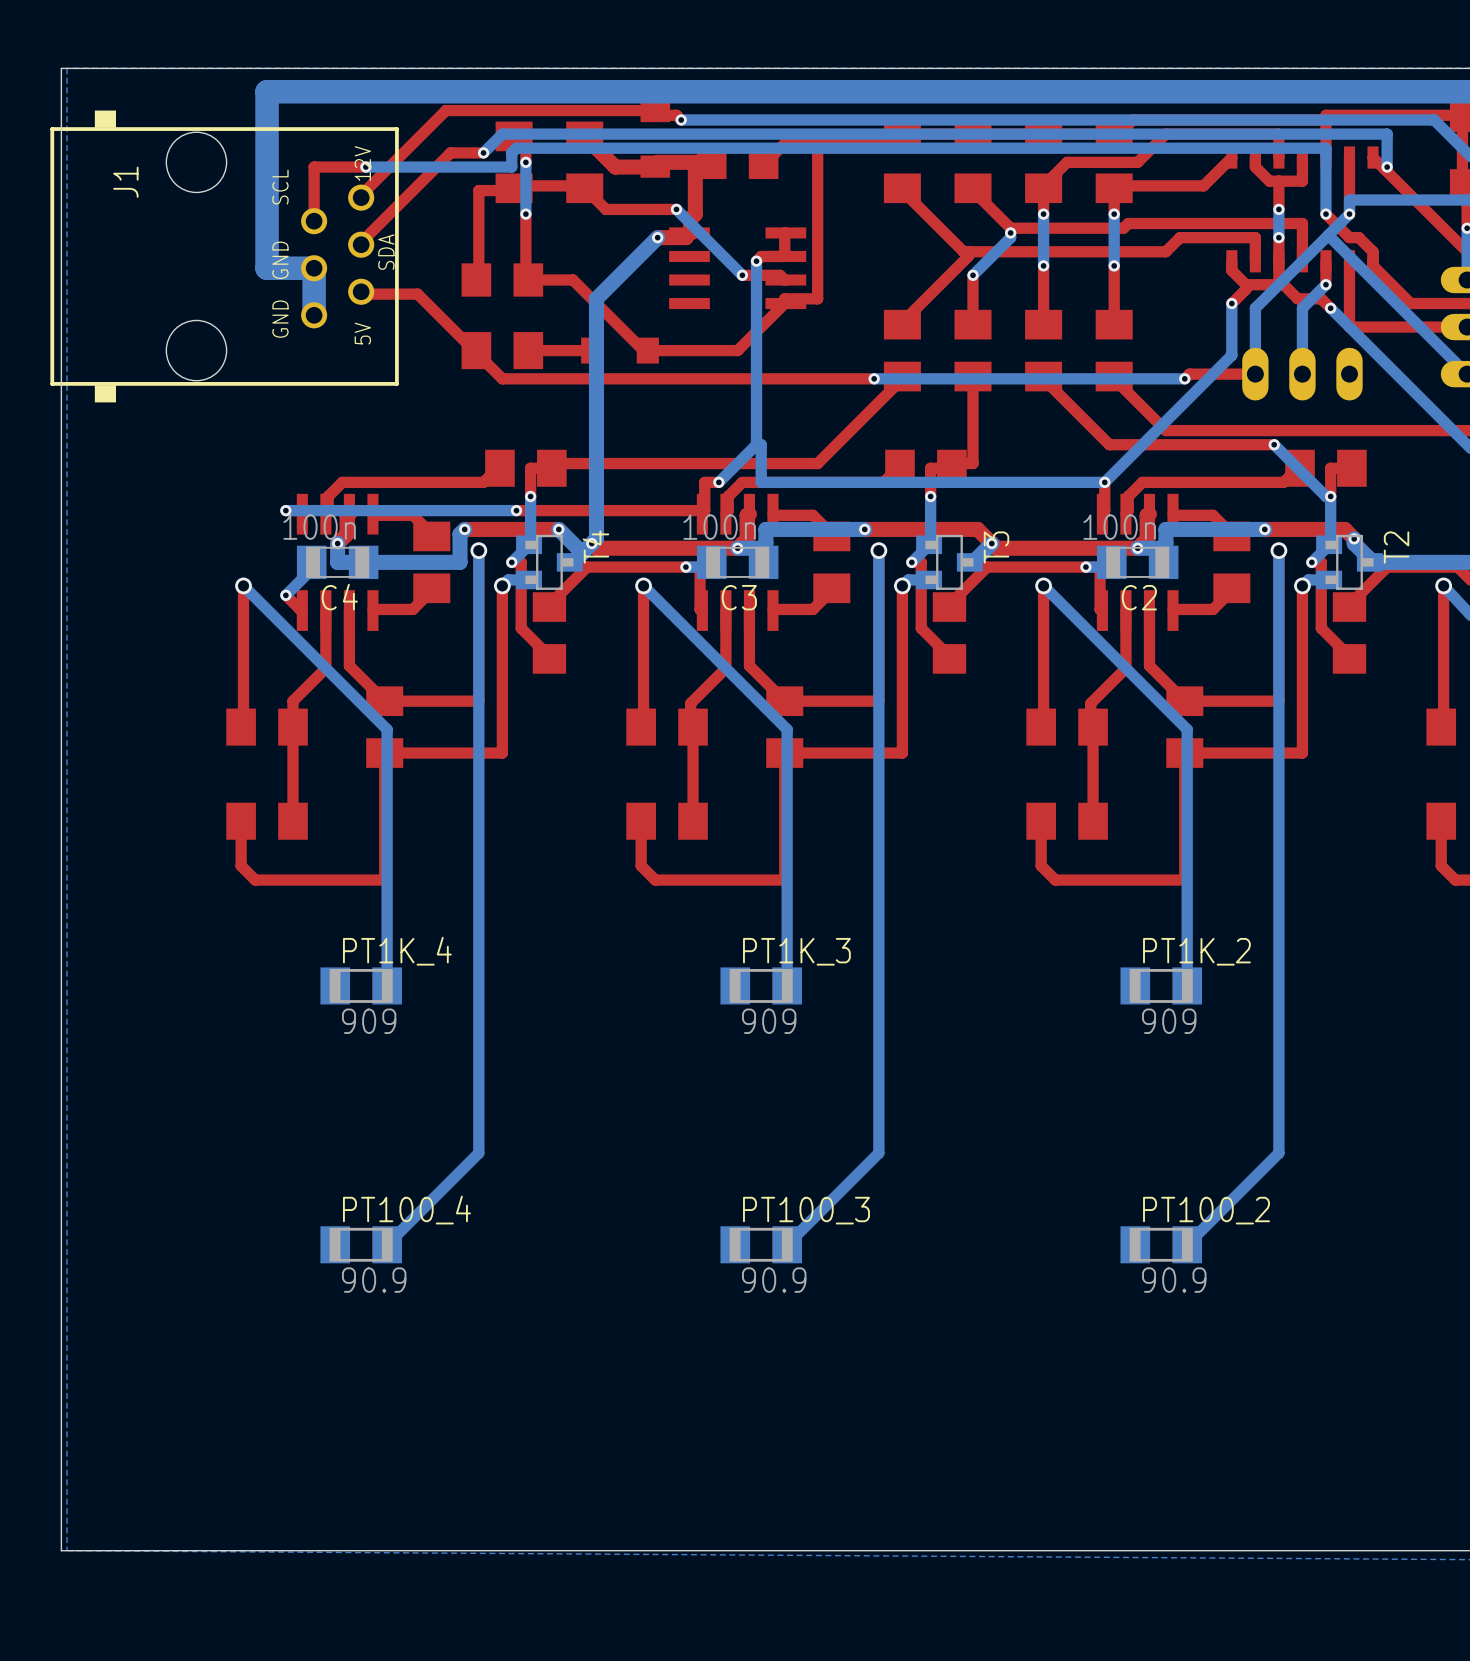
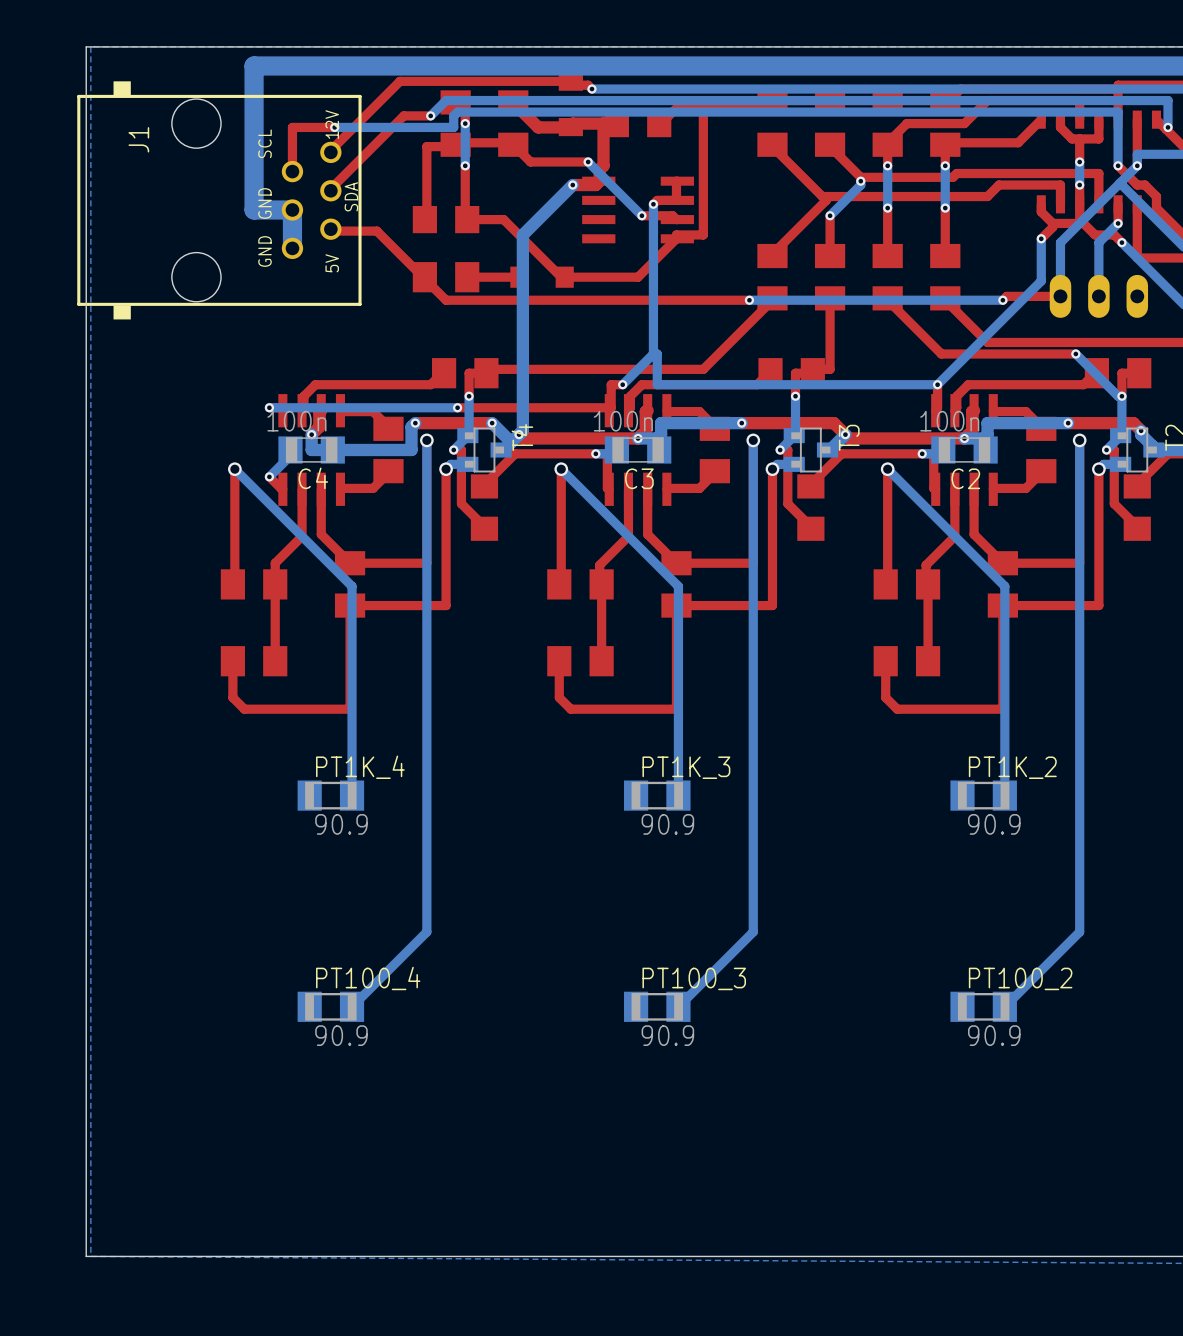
PT1K_4 value: 909 (369, 1021) -> 90.9 (341, 824)
PT1K_3 value: 909 (769, 1021) -> 90.9 (667, 824)
PT1K_2 value: 909 (1169, 1021) -> 90.9 (994, 824)

